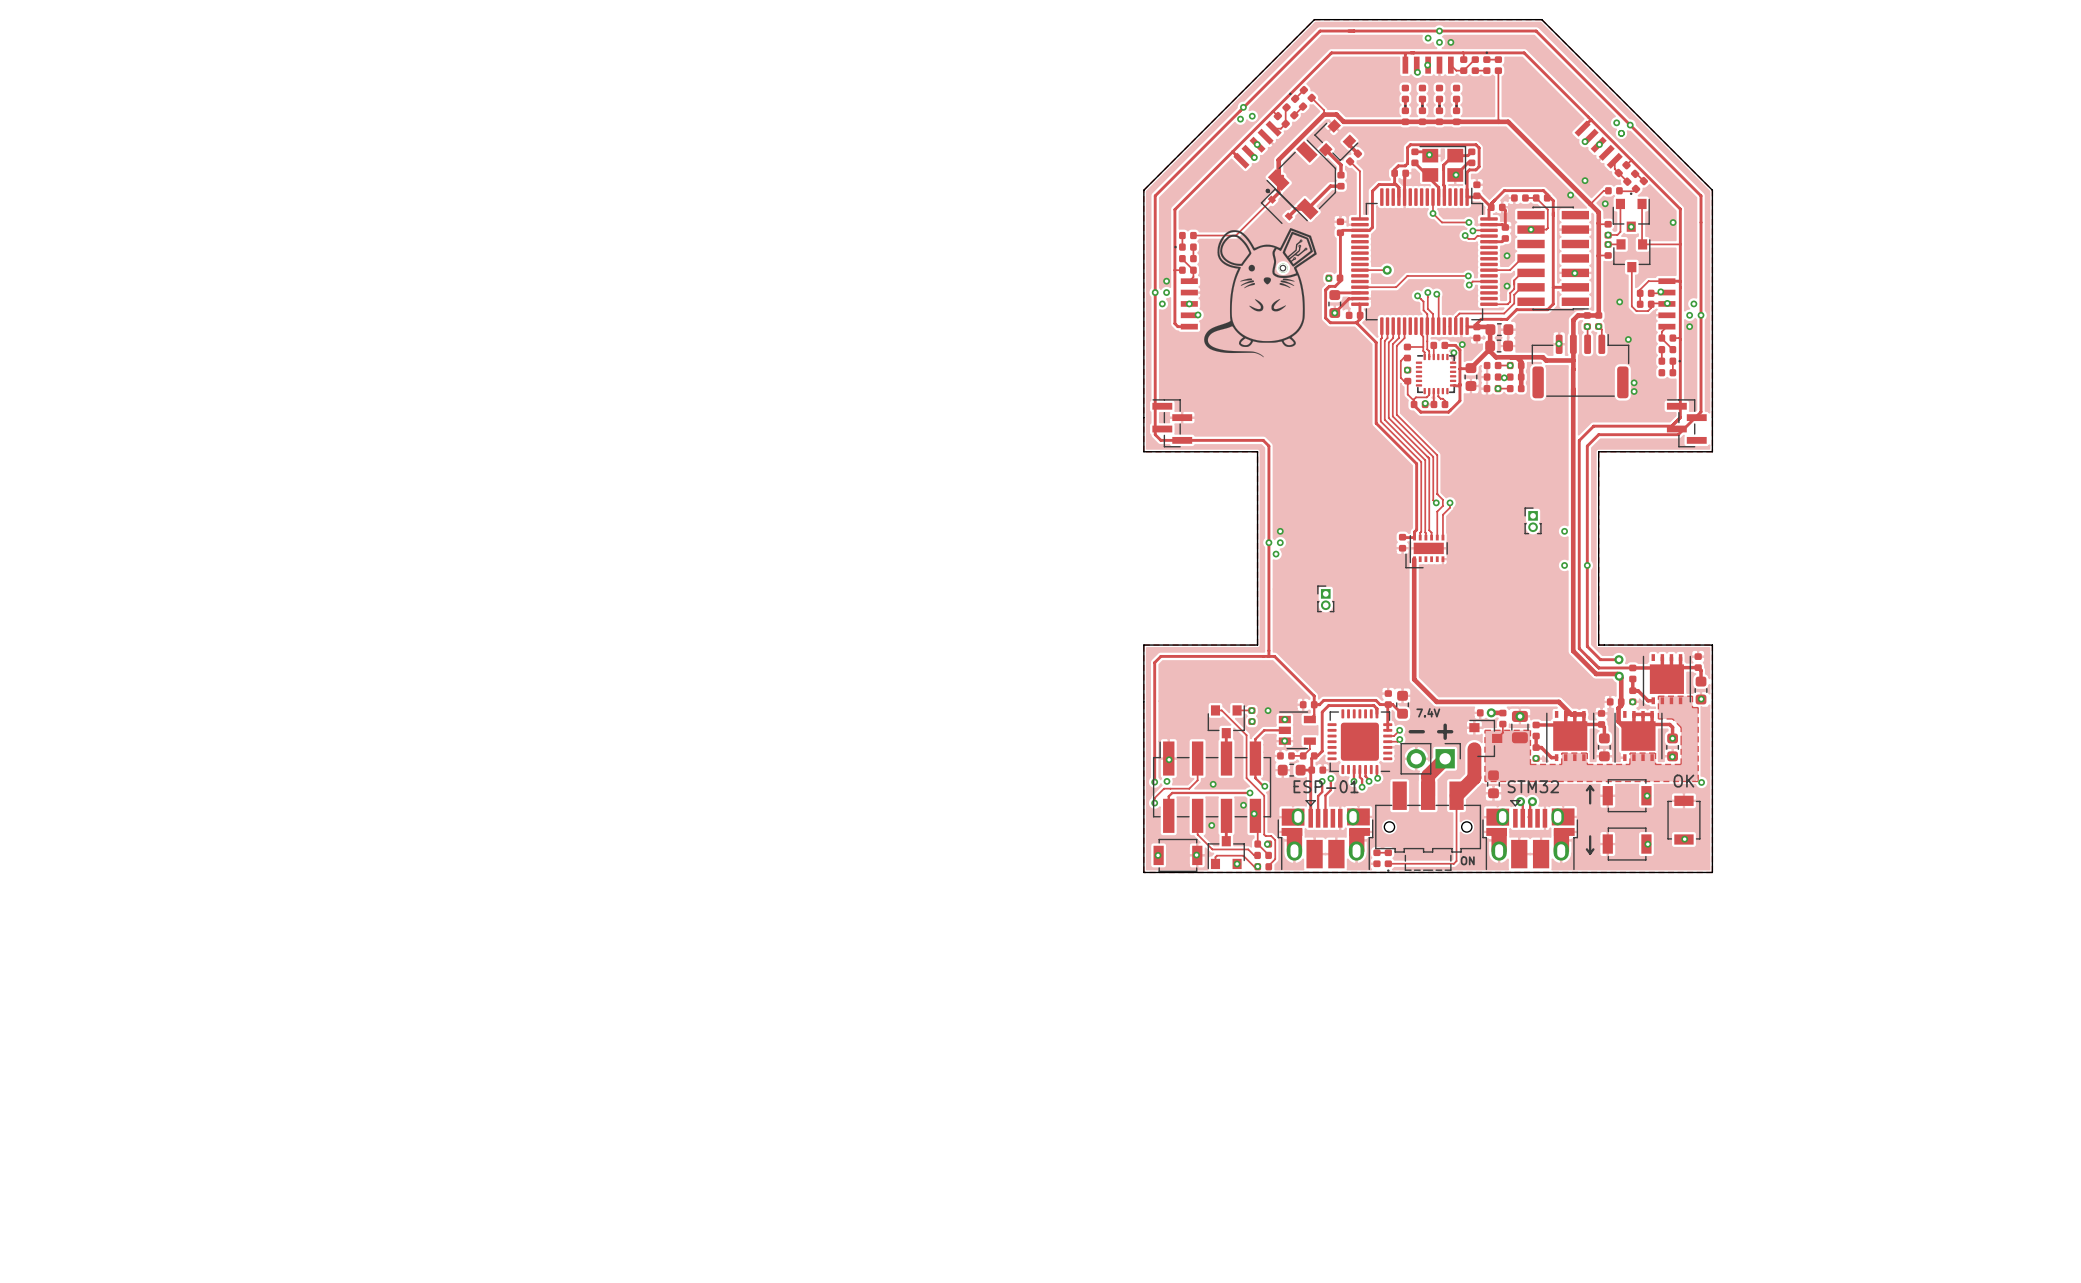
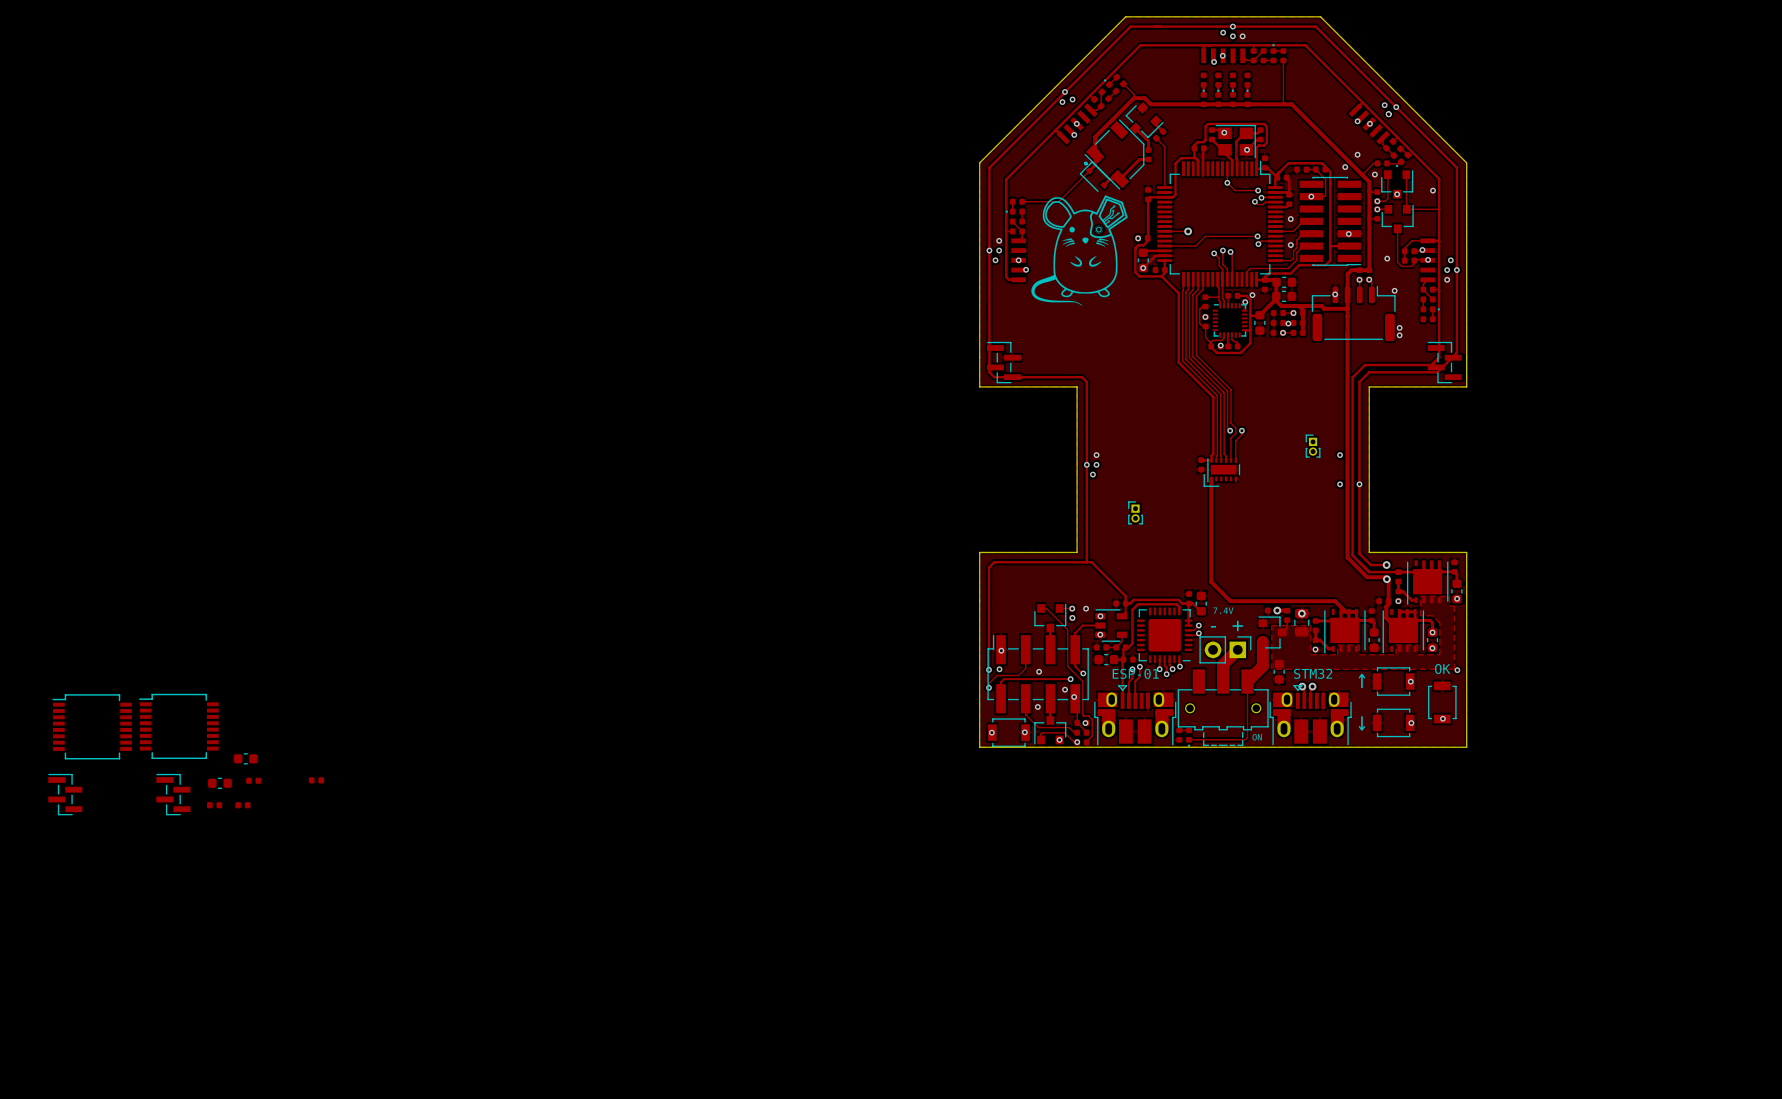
part: none -> (92, 726)
part: none -> (178, 726)
part: none -> (245, 758)
part: none -> (253, 780)
part: none -> (316, 780)
part: none -> (219, 783)
part: none -> (65, 794)
part: none -> (173, 794)
part: none -> (214, 805)
part: none -> (242, 805)

